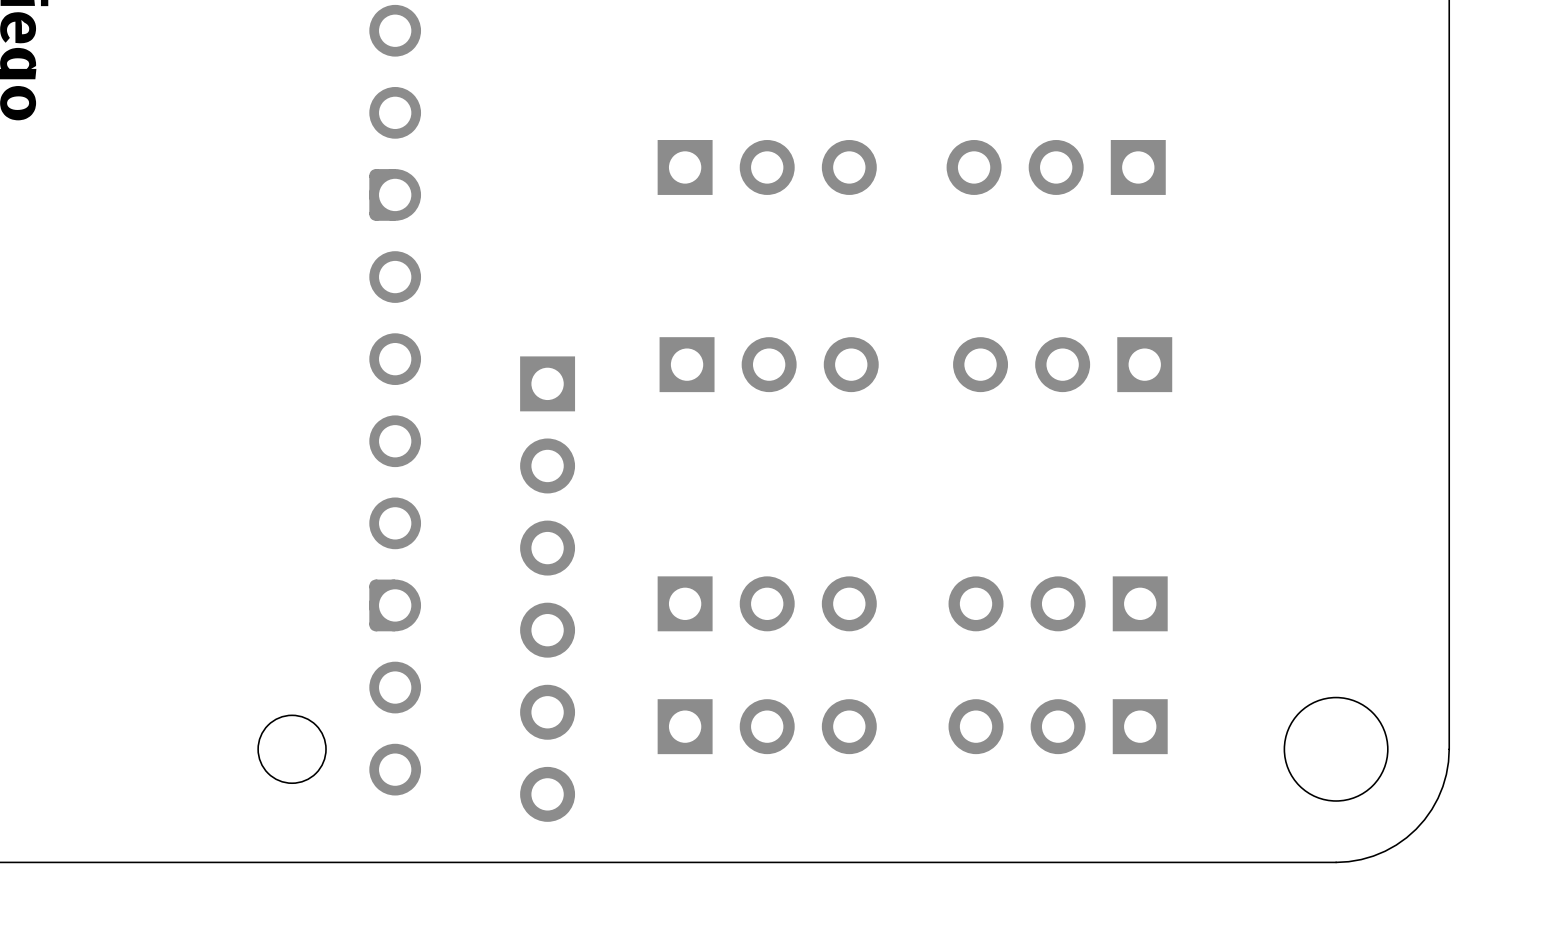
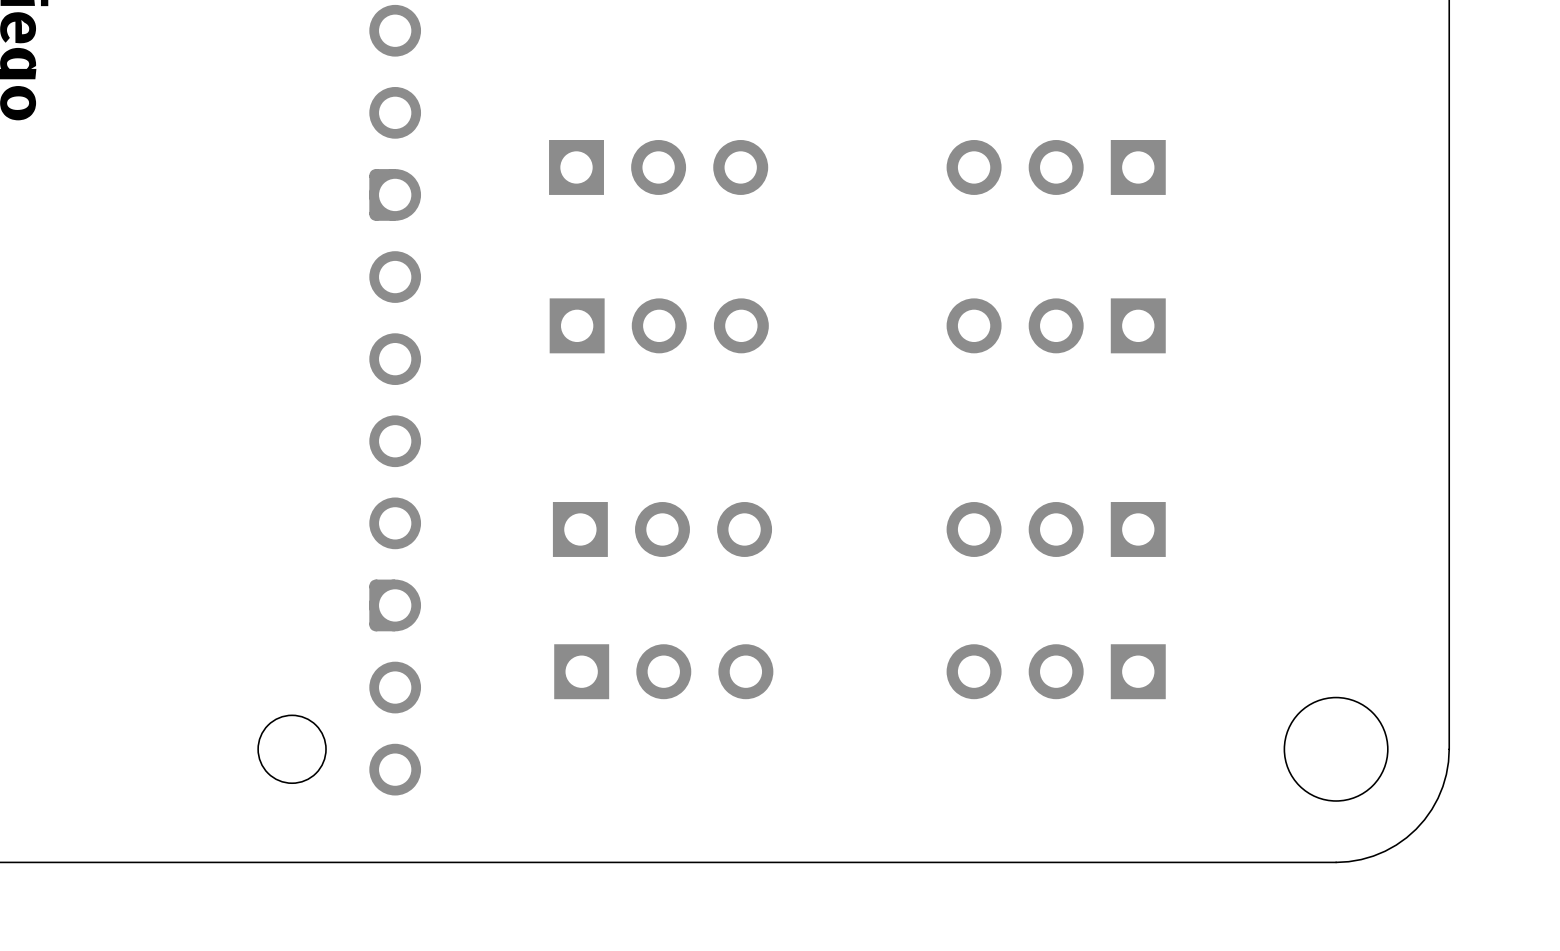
part: none -> (658, 167)
part: (767, 167) -> none
part: none -> (659, 325)
part: (769, 364) -> none
part position: (1062, 364) -> (1056, 325)
part: none -> (662, 529)
part: none -> (1056, 529)
part: (547, 589) -> none
part: (767, 603) -> none
part: (1058, 603) -> none
part: none -> (663, 671)
part: none -> (1056, 671)
part: (767, 726) -> none
part: (1058, 726) -> none

